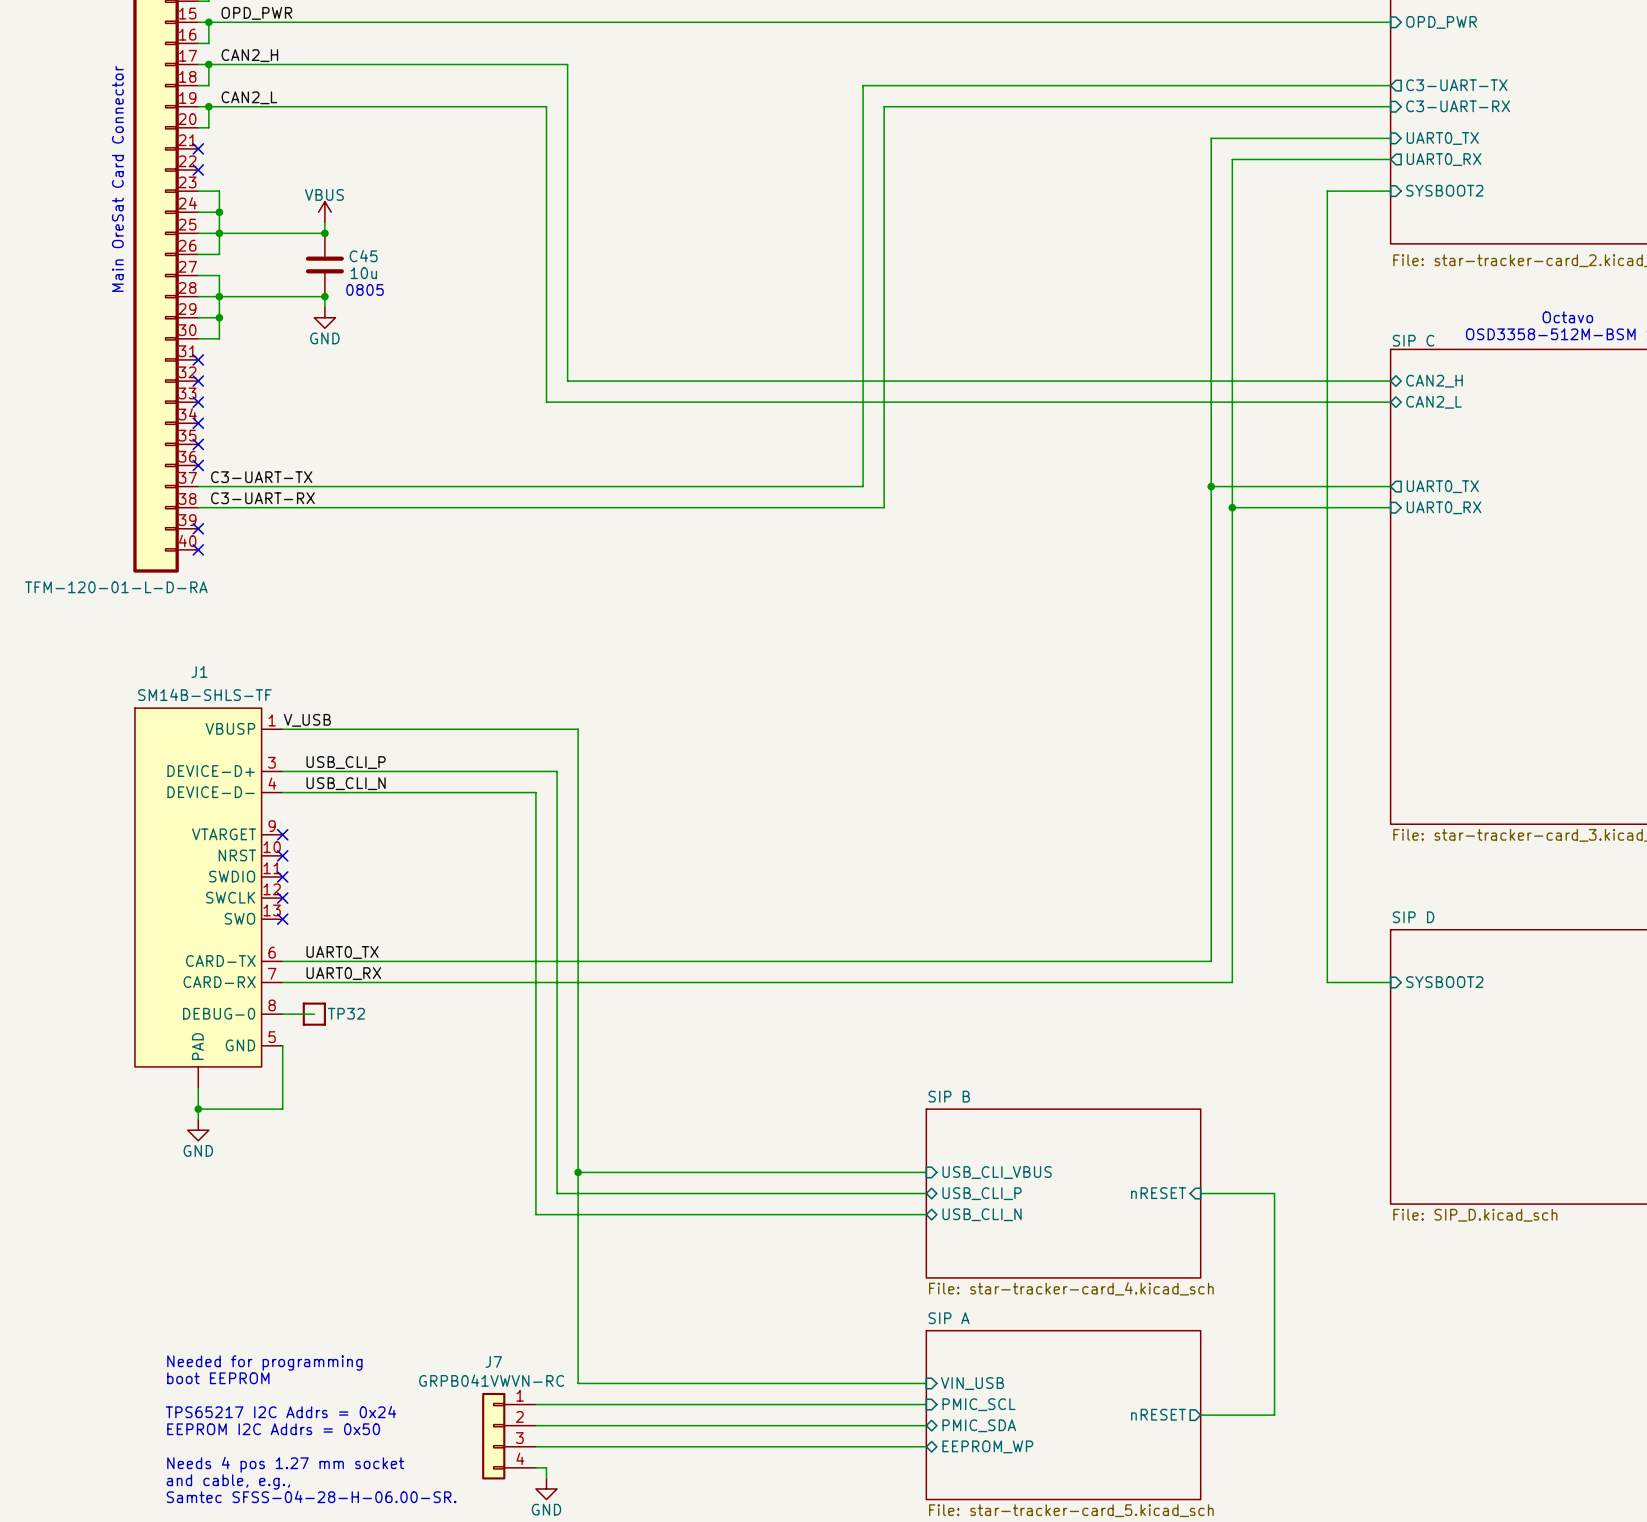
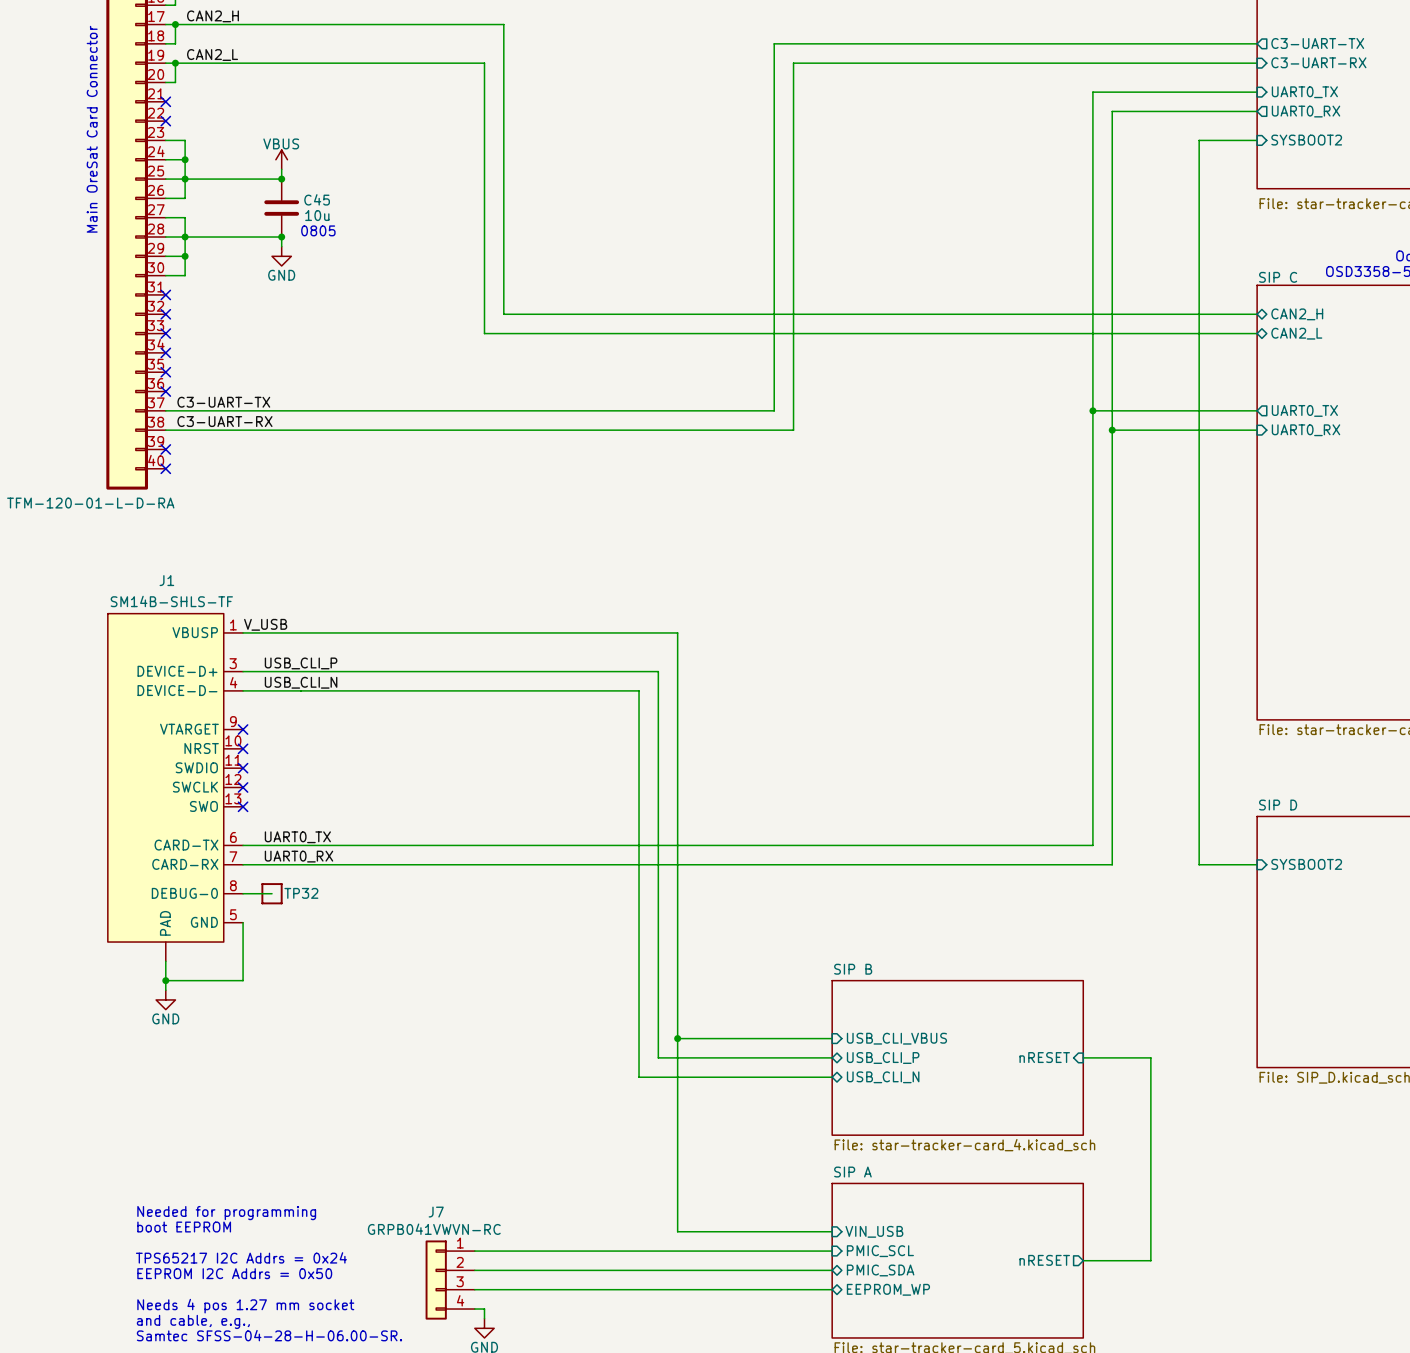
wire: (578, 729) (578, 1383) (757, 1383) -> (513, 632) (677, 632) (677, 1231)
wire: (557, 771) (557, 1193) (736, 1193) -> (494, 671) (658, 671) (658, 1057)
wire: (535, 792) (535, 1214) (715, 1214) -> (474, 690) (639, 690) (639, 1077)
wire: (578, 1172) (757, 1172) -> none
junction: (578, 1172) -> none
junction: none -> (677, 1038)

